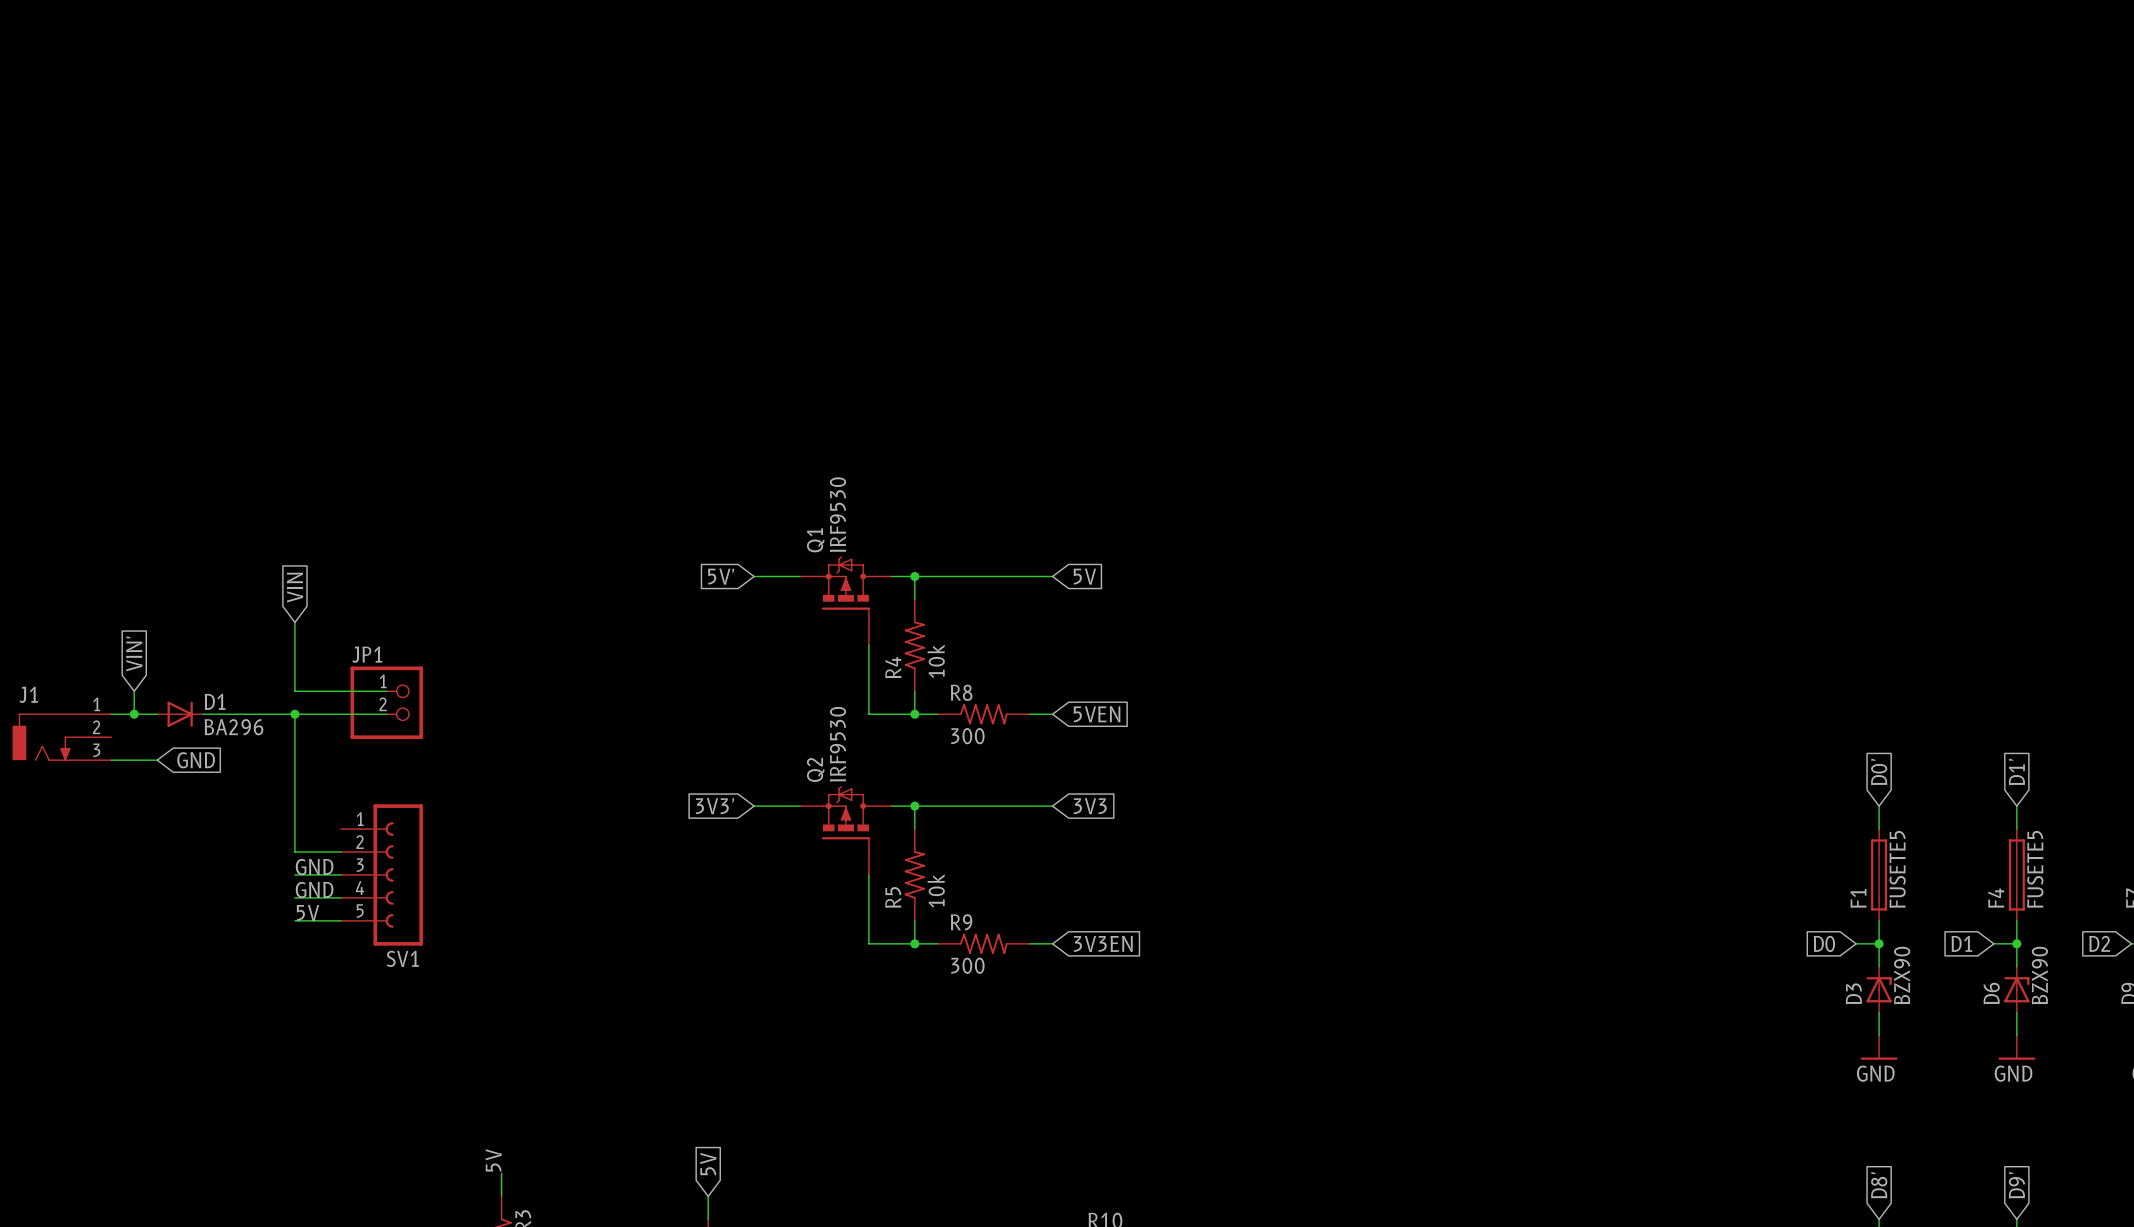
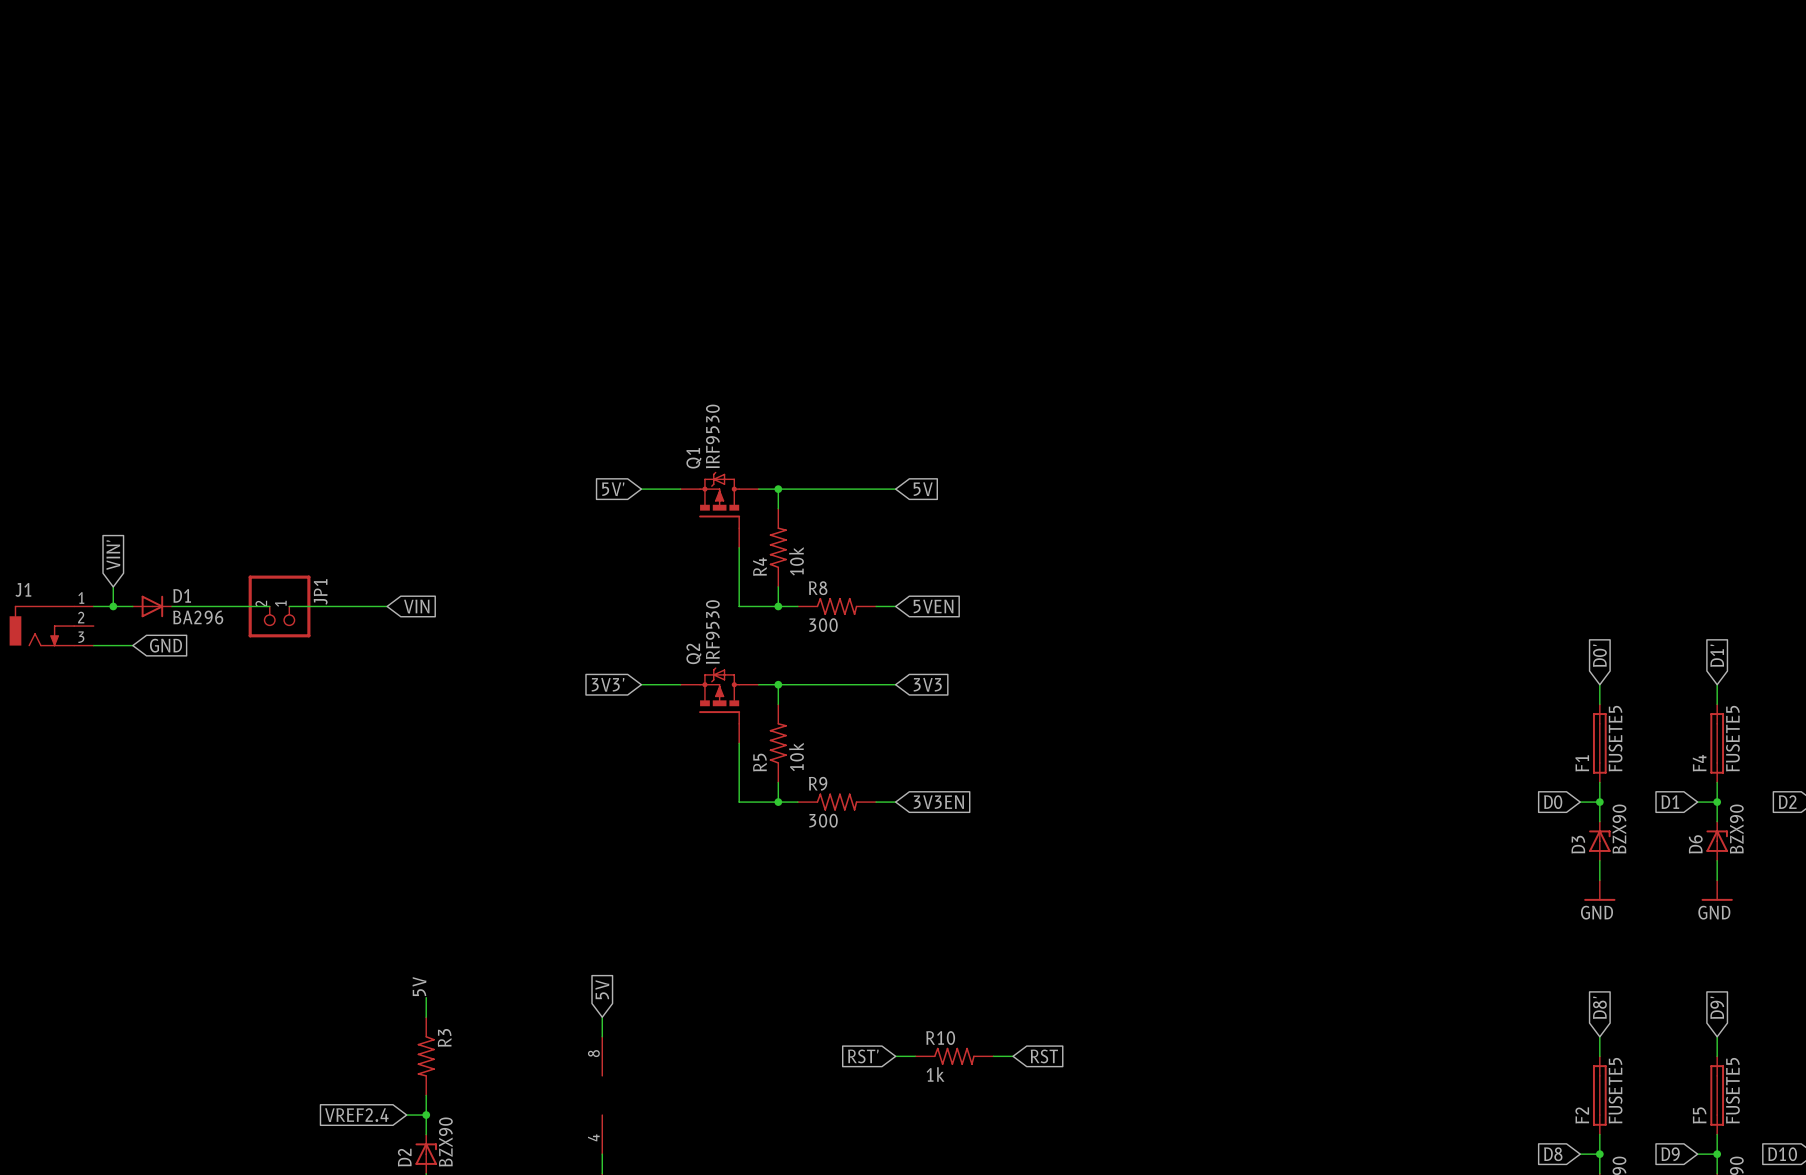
global label rotation: 0° (295, 587) -> 90° clockwise (416, 606)
global label position: VIN (295, 587) -> VIN (416, 606)
wire: (294, 622) (294, 691) (386, 691) -> none
JP1 rotation: 0° (386, 702) -> 90° clockwise (279, 606)
JP1 position: (386, 702) -> (279, 606)
wire: (294, 714) (294, 852) (340, 852) -> none
junction: (294, 714) -> none
wire: (317, 714) (340, 714) -> none
wire: none -> (328, 606) (387, 606)
label: GND (314, 867) -> none
wire: (294, 874) (340, 874) -> none
SV1: (381, 874) -> none
label: GND (314, 889) -> none
wire: (294, 897) (340, 897) -> none
label: 5V (307, 912) -> none
wire: (294, 920) (340, 920) -> none

